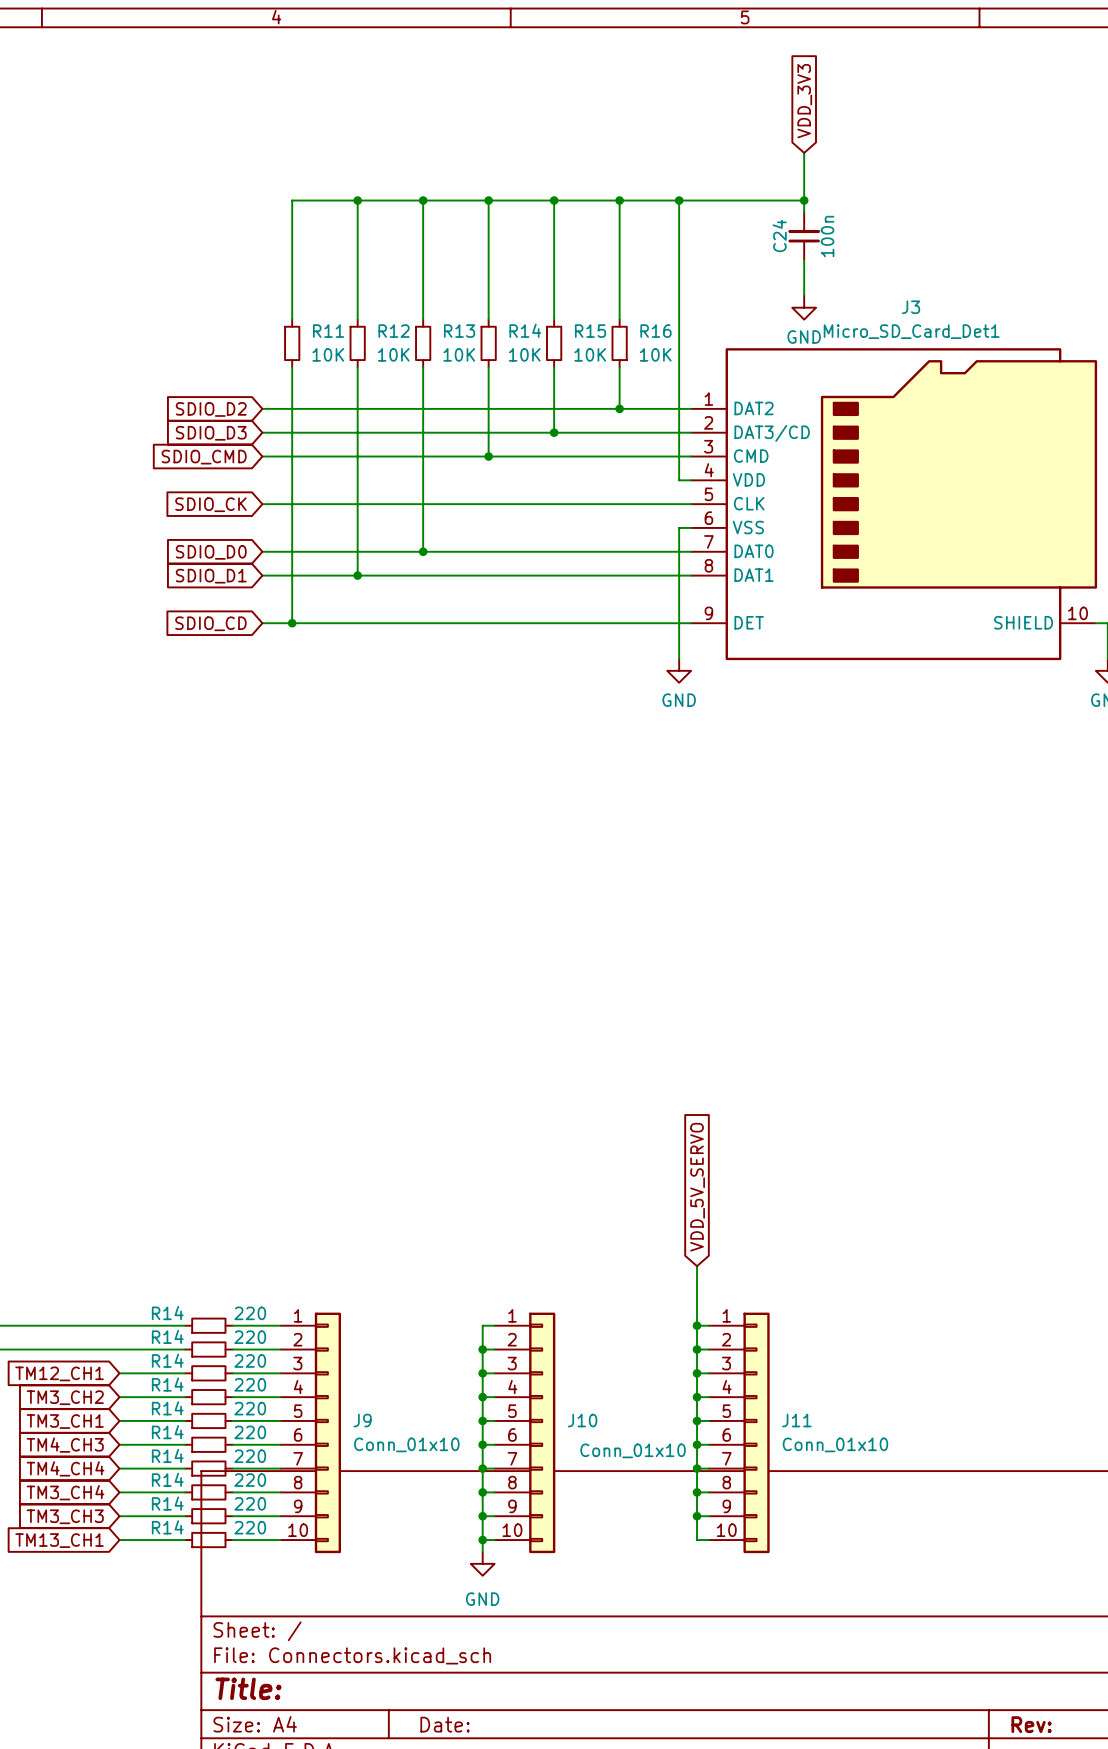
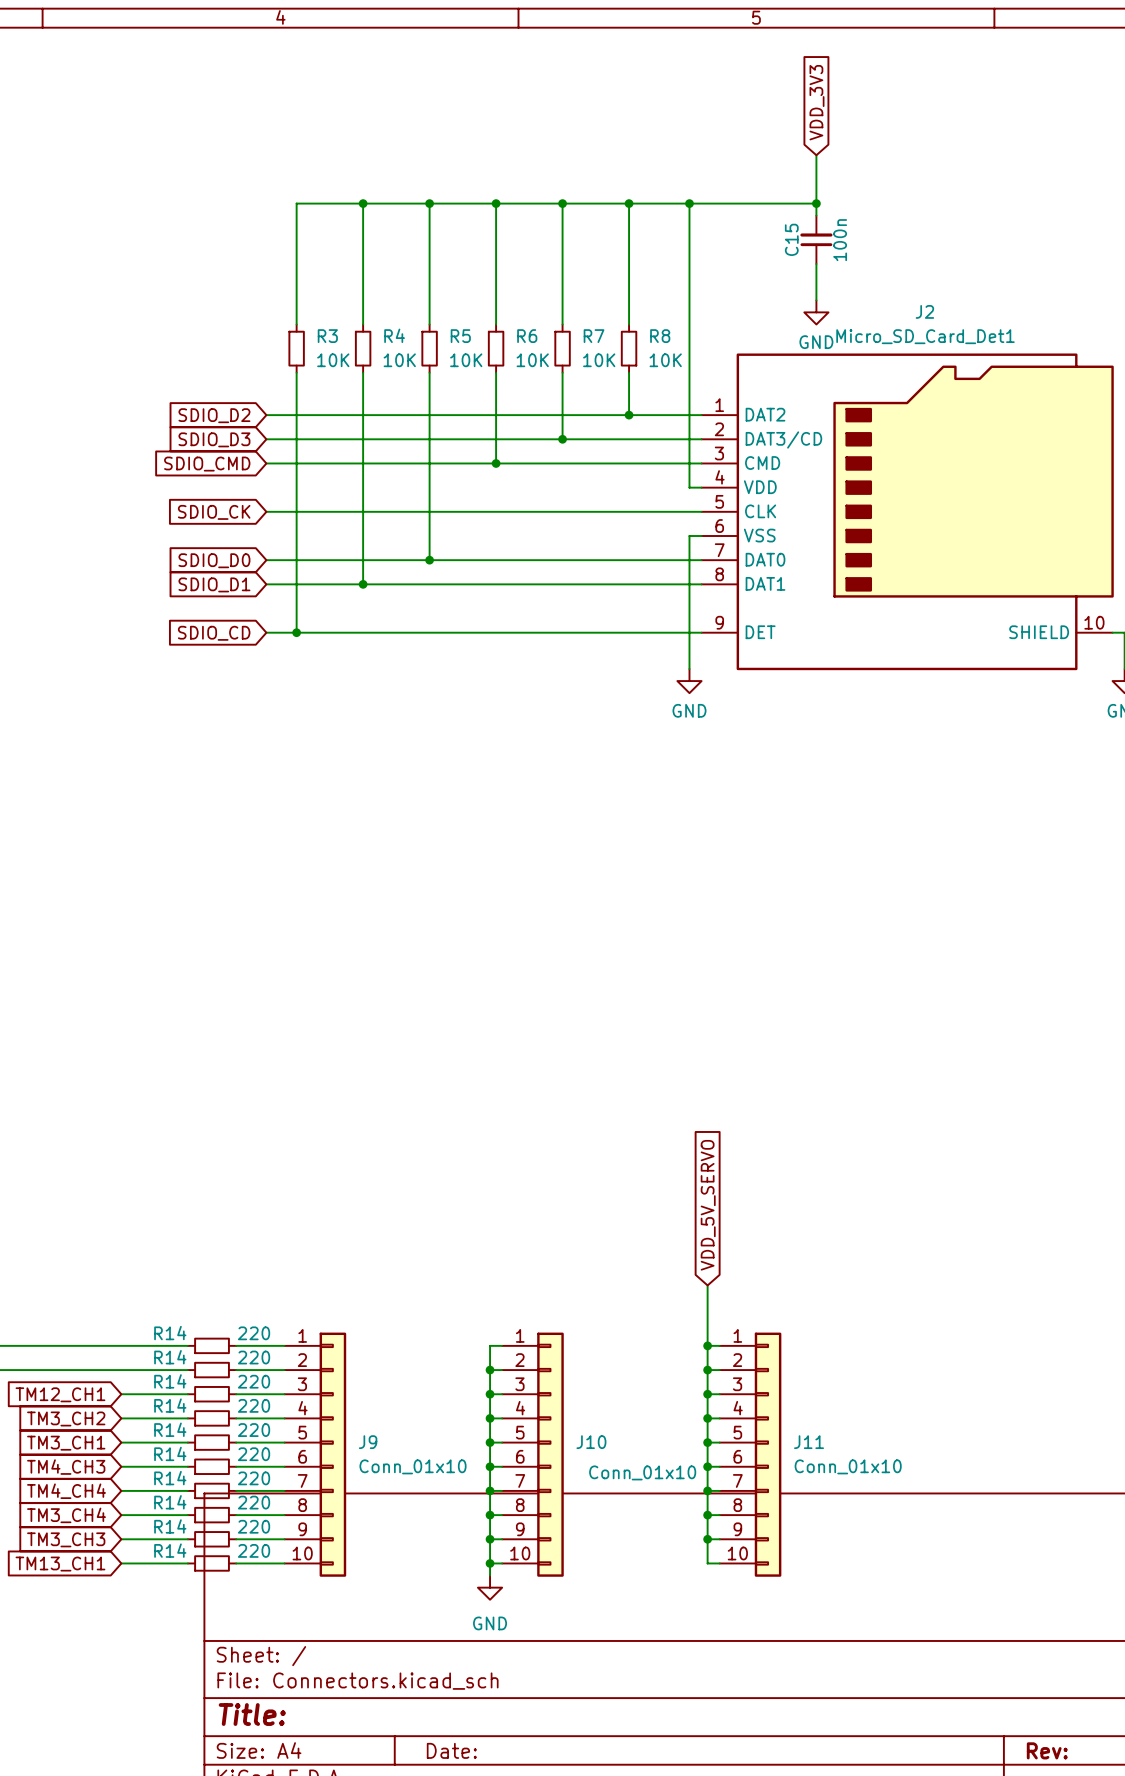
C24 name: C24 (779, 235) -> C15 (791, 239)
J3 name: J3 (911, 307) -> J2 (924, 311)
R14 name: R14 (525, 330) -> R6 (527, 336)
R11 name: R11 (328, 331) -> R3 (327, 336)
R12 name: R12 (394, 331) -> R4 (394, 335)
R13 name: R13 (459, 331) -> R5 (460, 336)
R15 name: R15 (590, 331) -> R7 (594, 336)
R16 name: R16 (656, 331) -> R8 (660, 336)

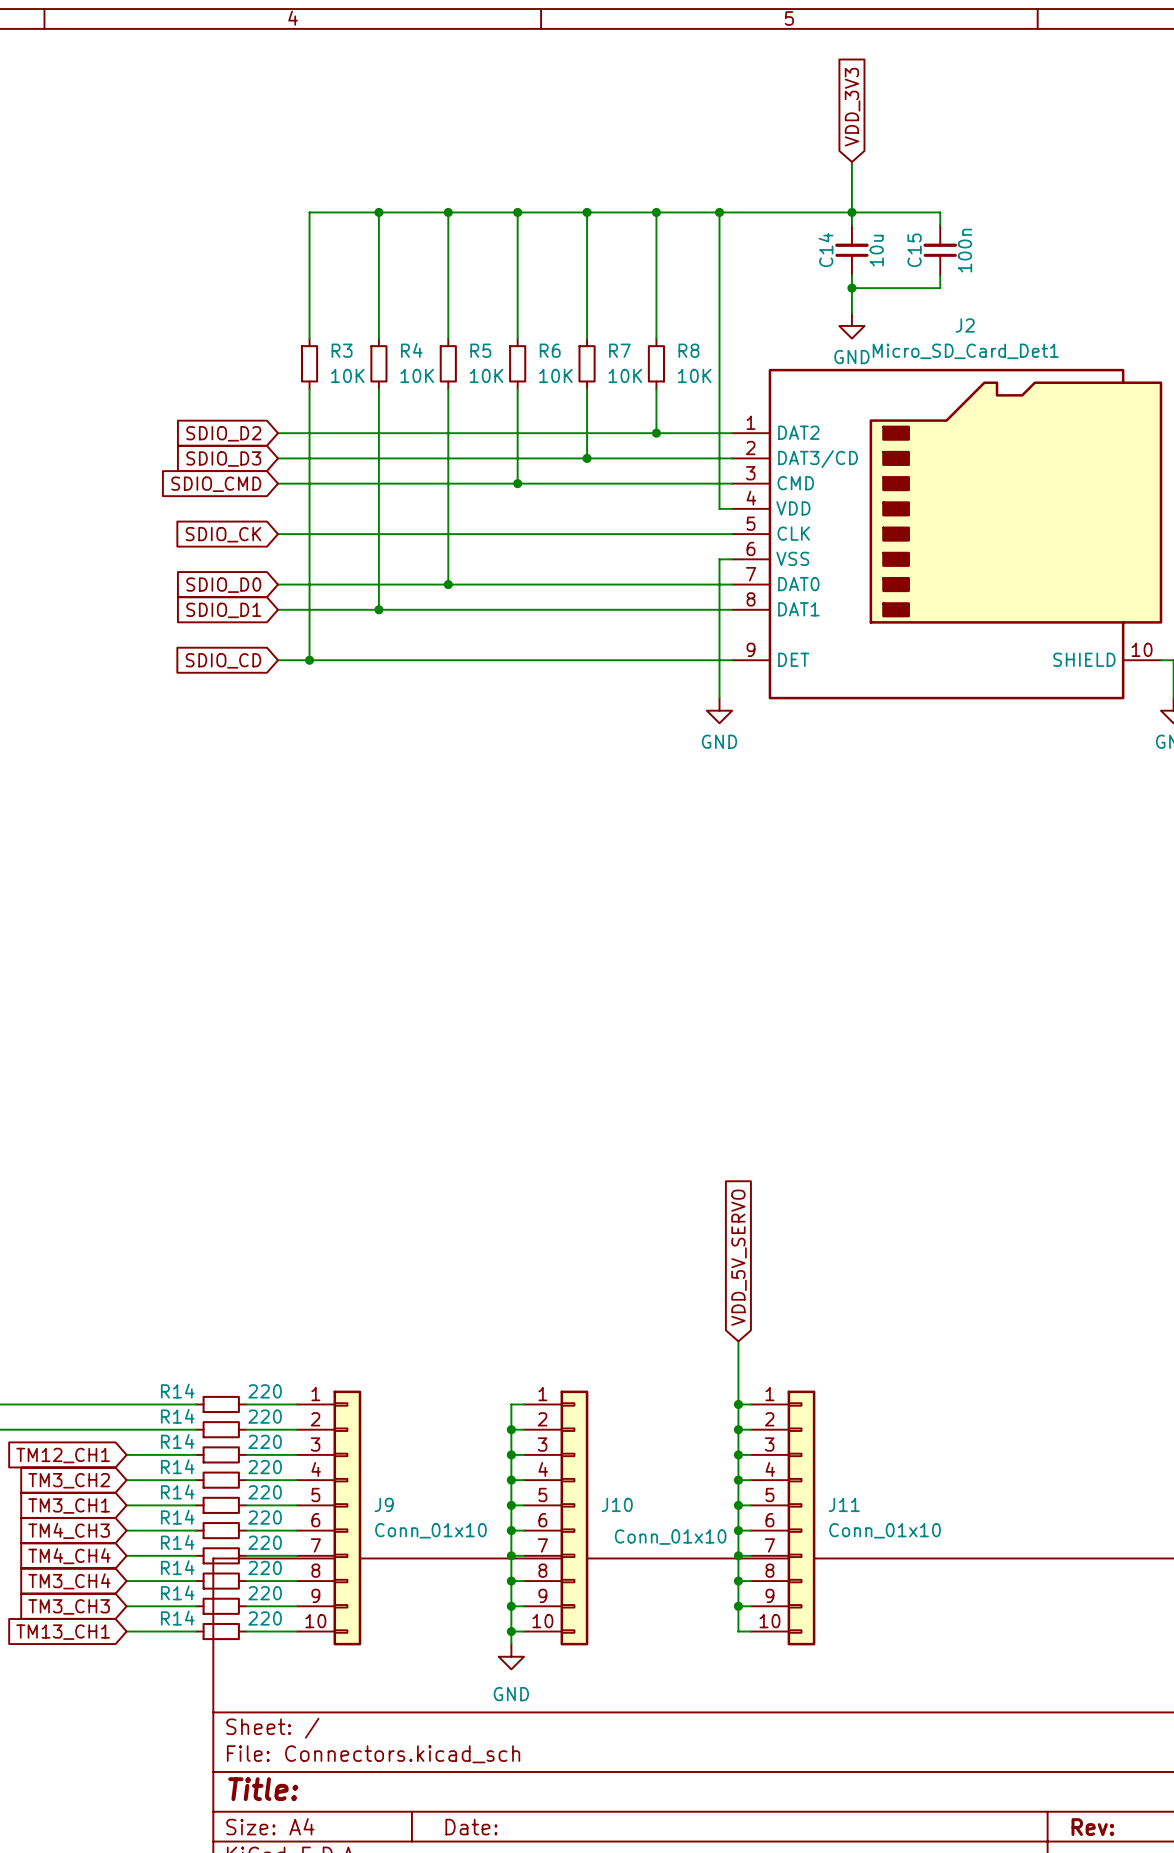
wire: none -> (851, 212) (940, 212) (940, 225)
C15 name: C15 (791, 239) -> C14 (825, 249)
C15: none -> 100n (940, 250)
C15 value: 100n (840, 240) -> 10u (876, 250)
wire: none -> (940, 275) (940, 288) (851, 288)
junction: none -> (851, 288)

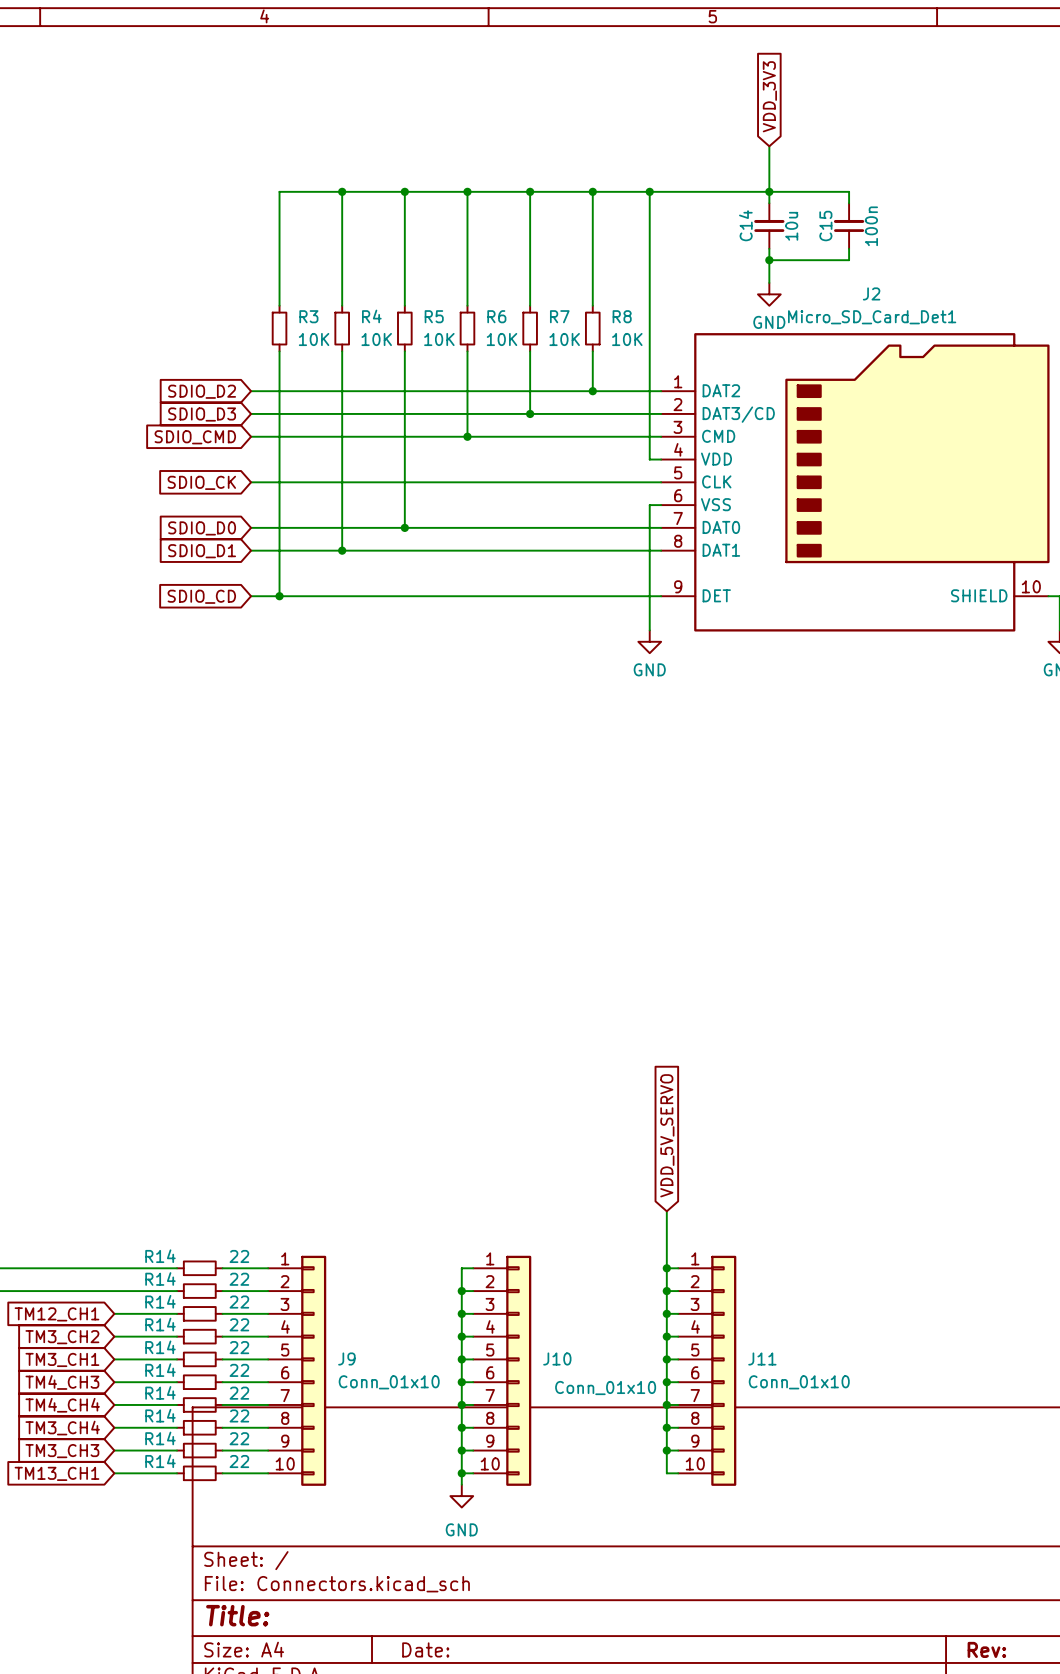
R14 value: 220 (265, 1391) -> 22 (239, 1256)
R14 value: 220 (265, 1416) -> 22 (239, 1279)
R14 value: 220 (265, 1441) -> 22 (239, 1302)
R14 value: 220 (265, 1467) -> 22 (239, 1324)
R14 value: 220 (265, 1492) -> 22 (239, 1347)
R14 value: 220 (265, 1517) -> 22 (239, 1370)
R14 value: 220 (265, 1542) -> 22 (239, 1393)
R14 value: 220 (265, 1567) -> 22 (239, 1415)
R14 value: 220 (265, 1593) -> 22 (239, 1438)
R14 value: 220 (265, 1618) -> 22 (239, 1461)

